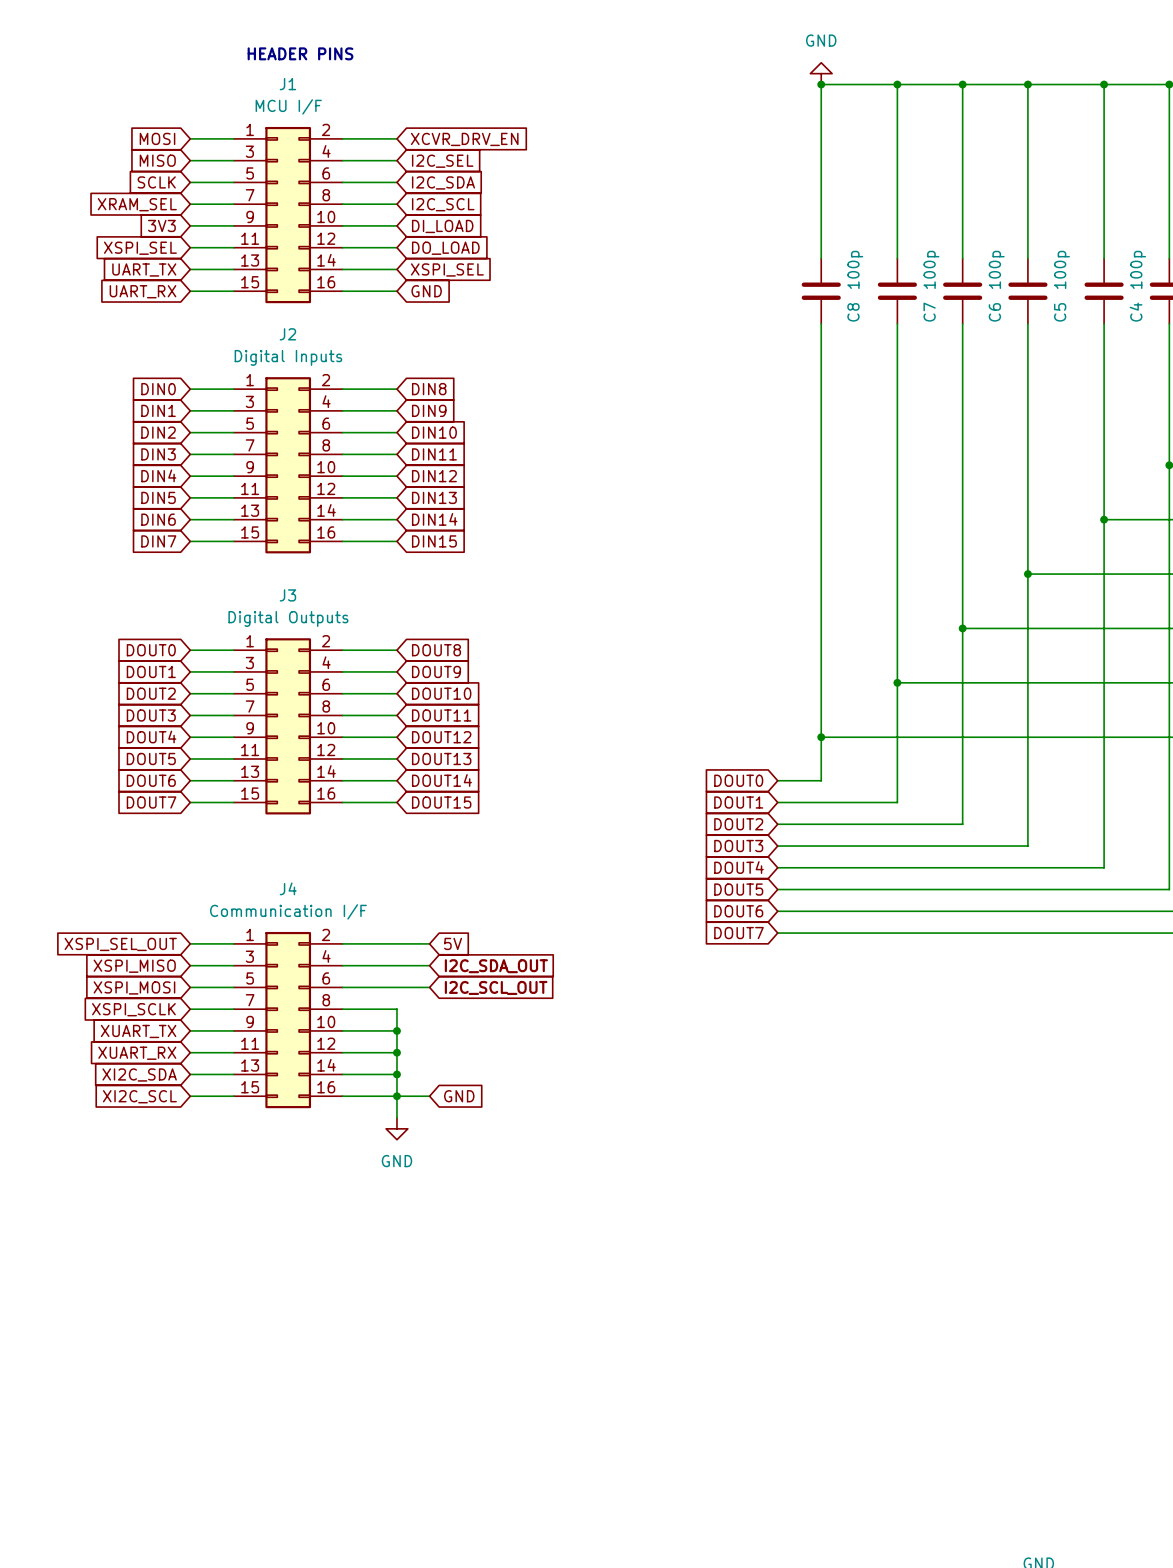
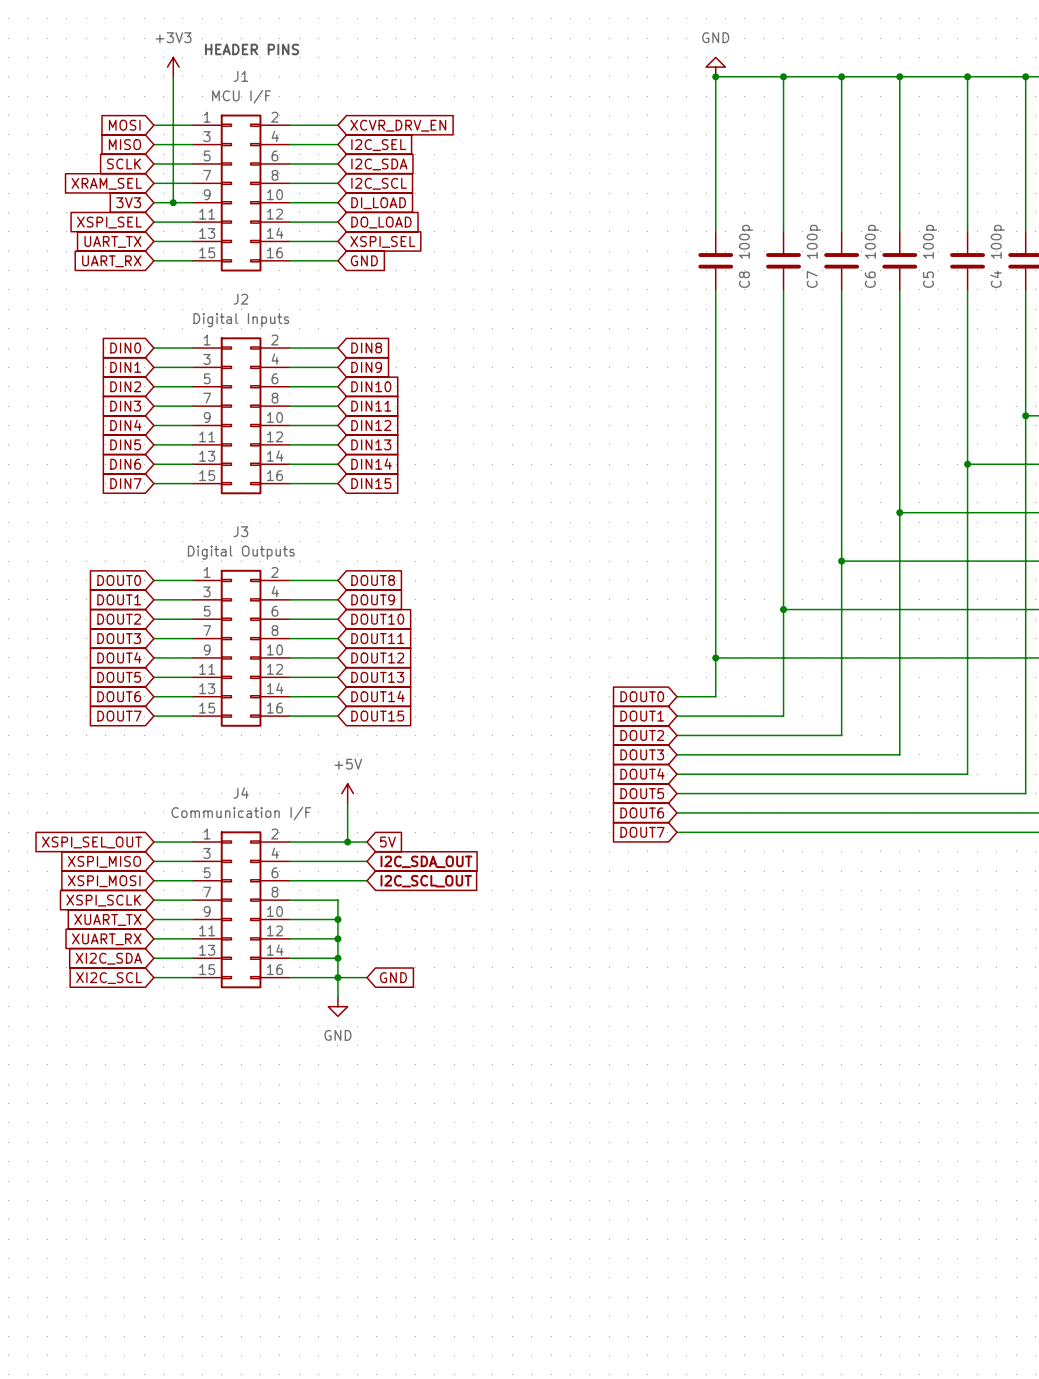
power symbol: none -> +3V3 (173, 67)
wire: none -> (173, 76) (173, 202)
junction: none -> (173, 202)
power symbol: none -> +5V (347, 793)
wire: none -> (347, 803) (347, 842)
junction: none -> (347, 842)

